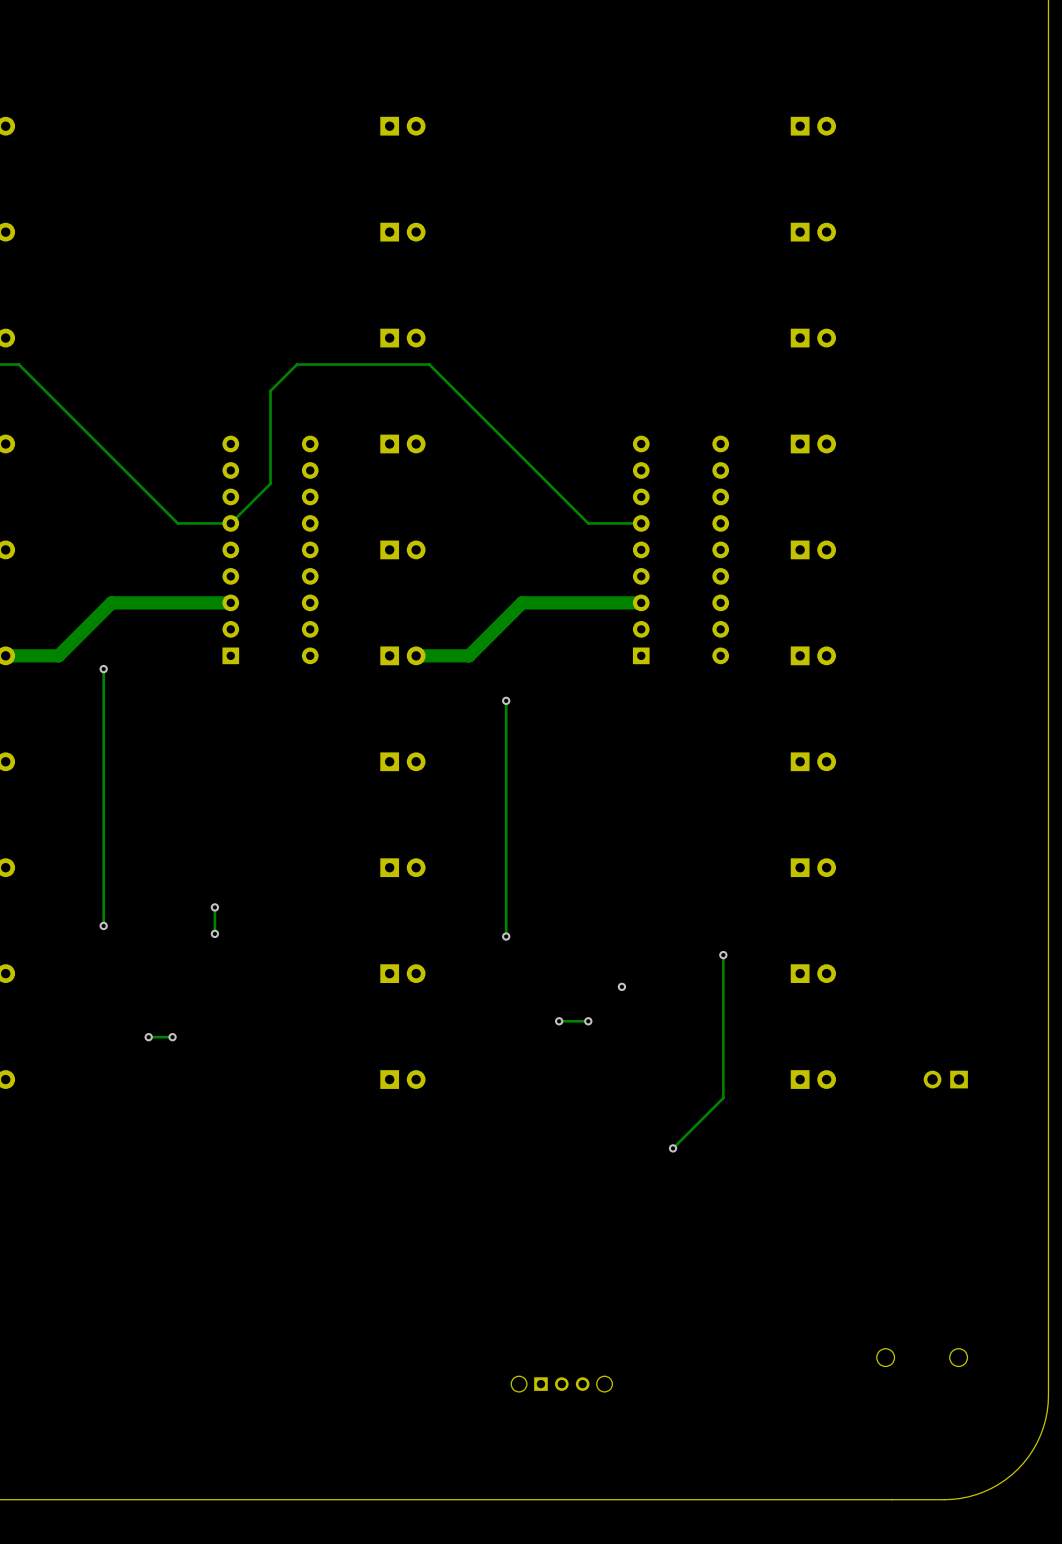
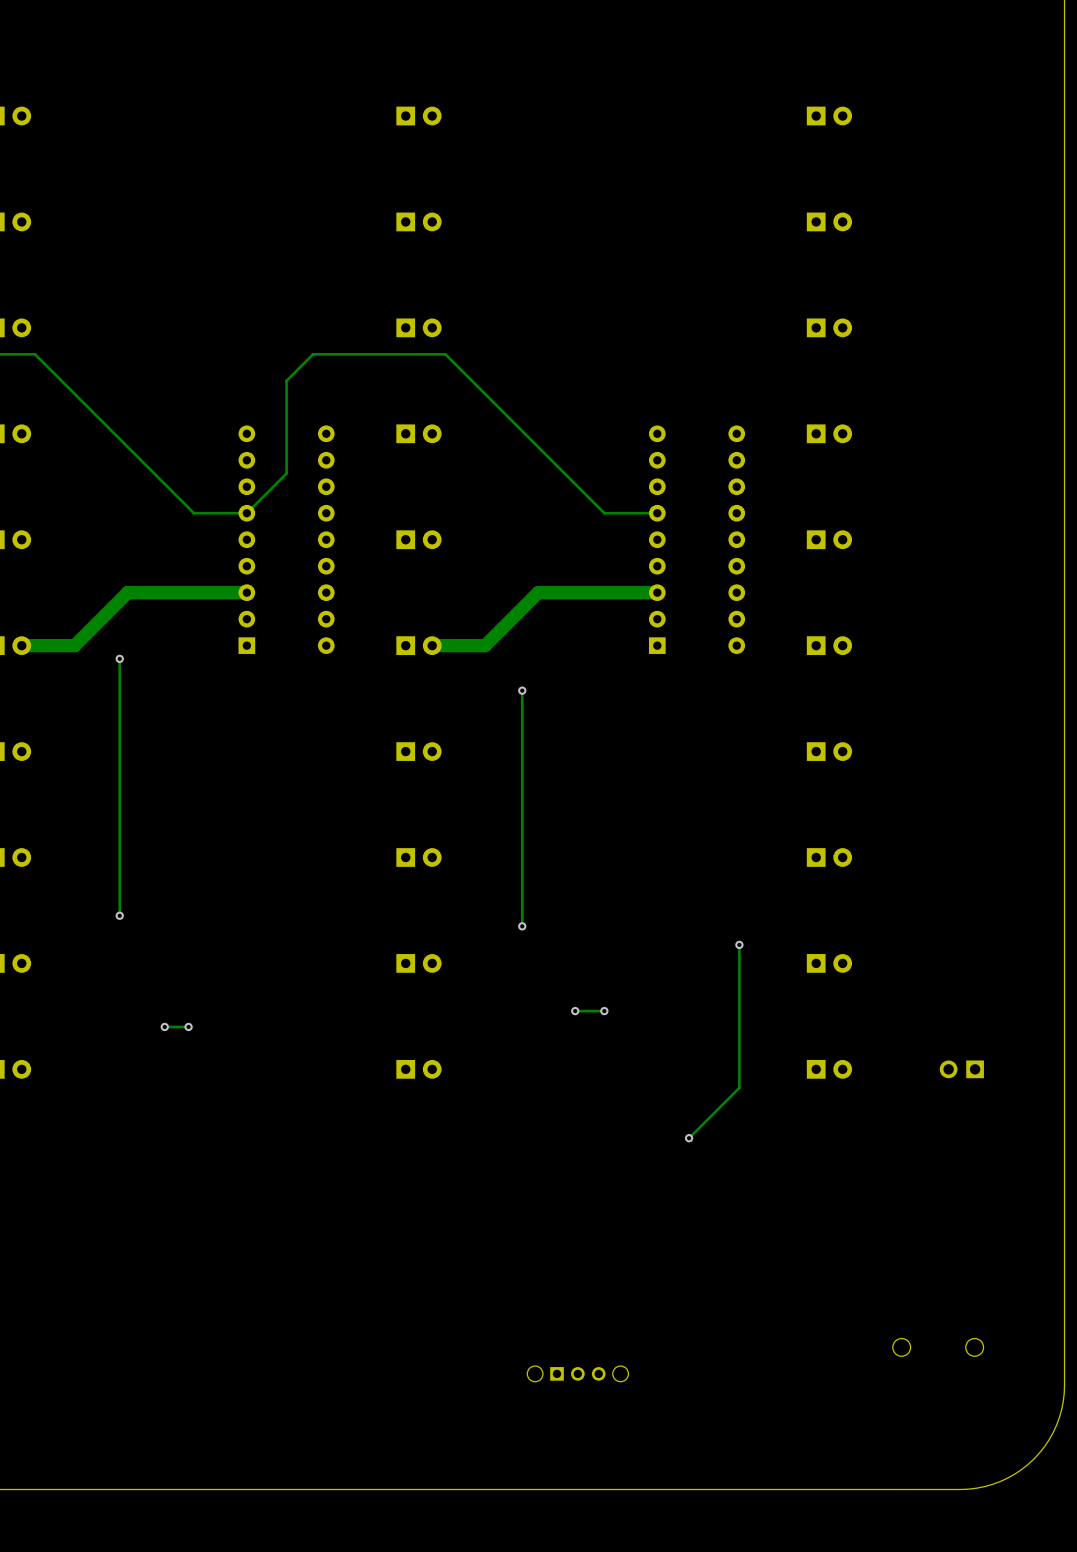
track: (214, 907) (214, 933) -> none
via: (214, 907) -> none
via: (214, 933) -> none
via: (621, 986) -> none

